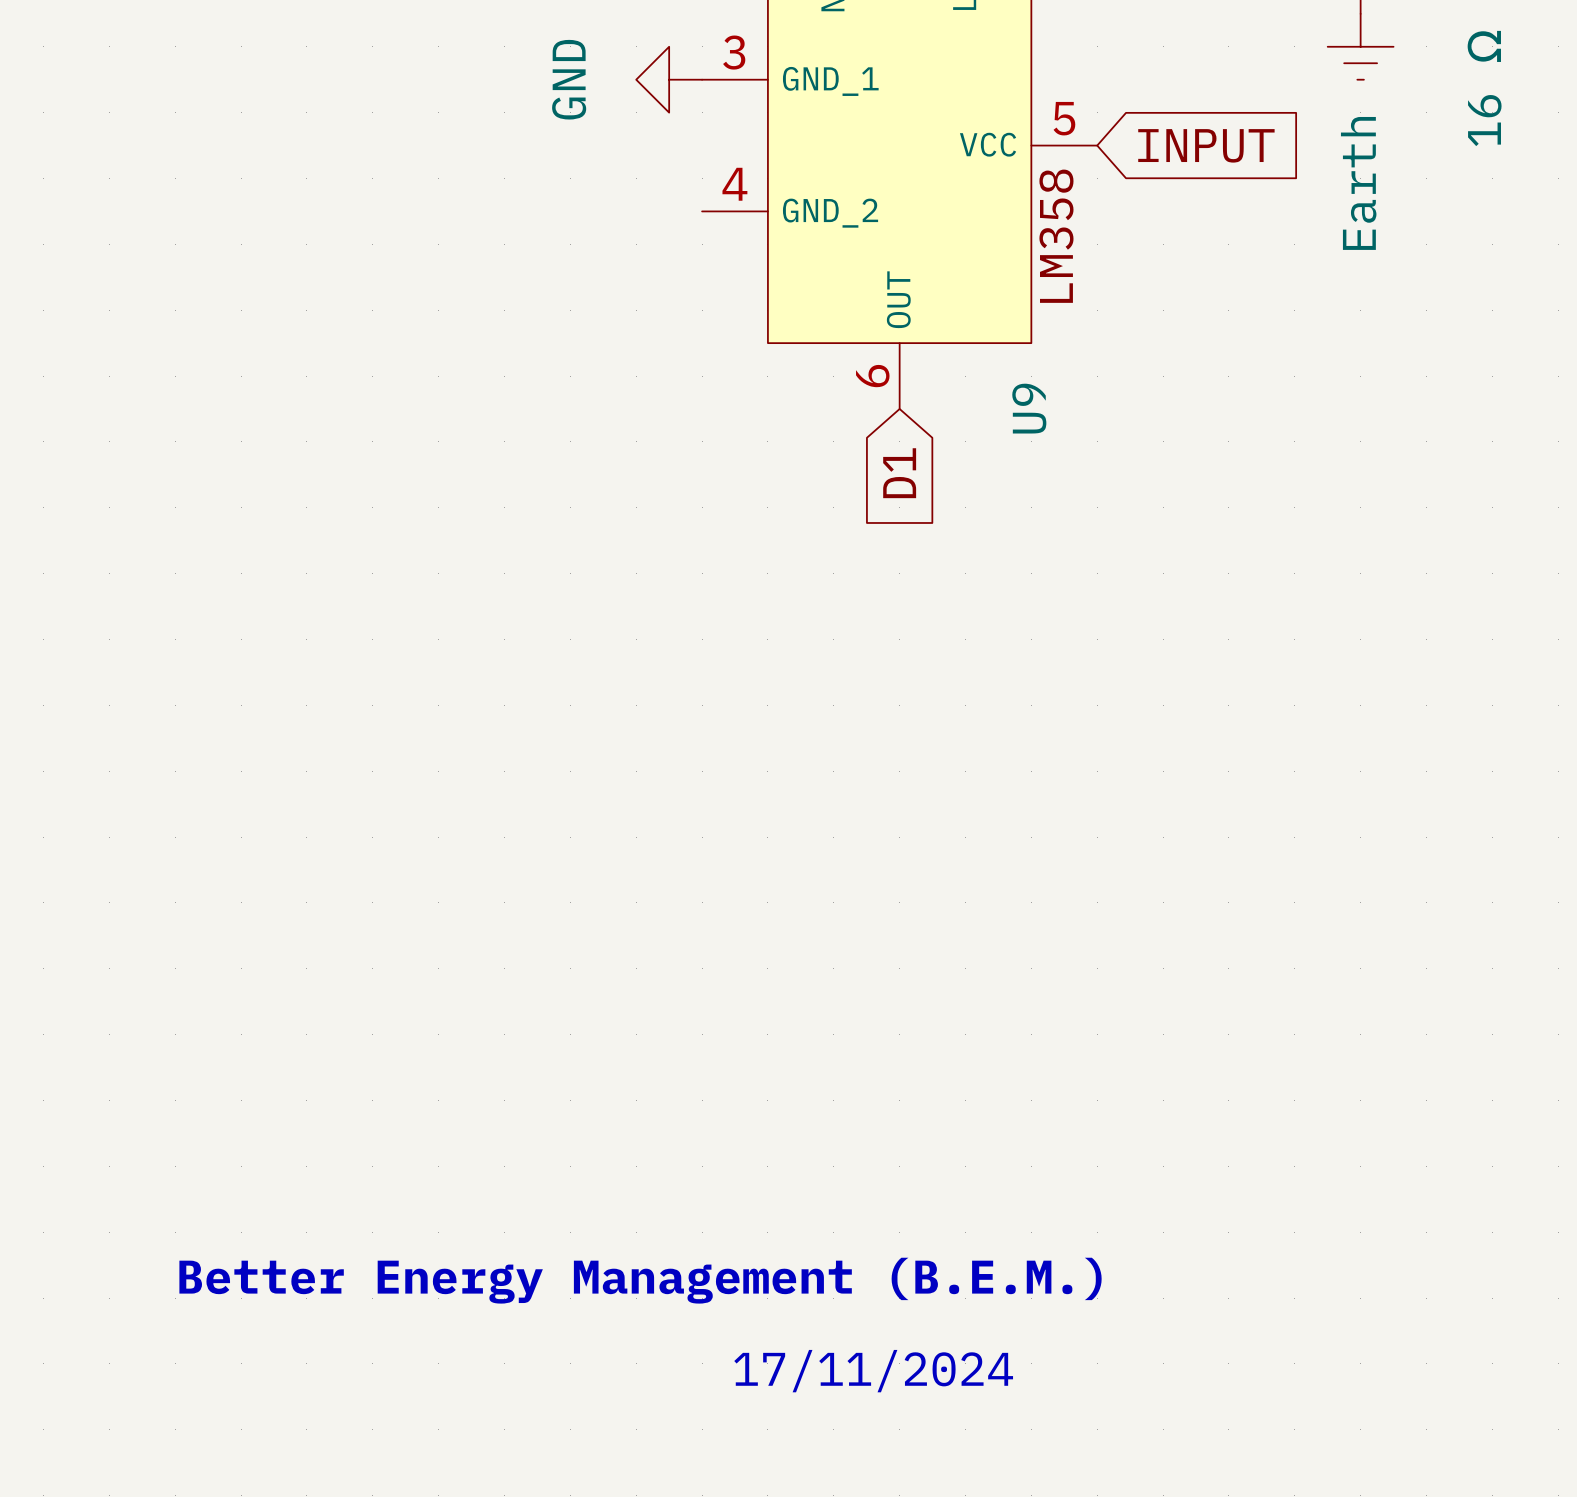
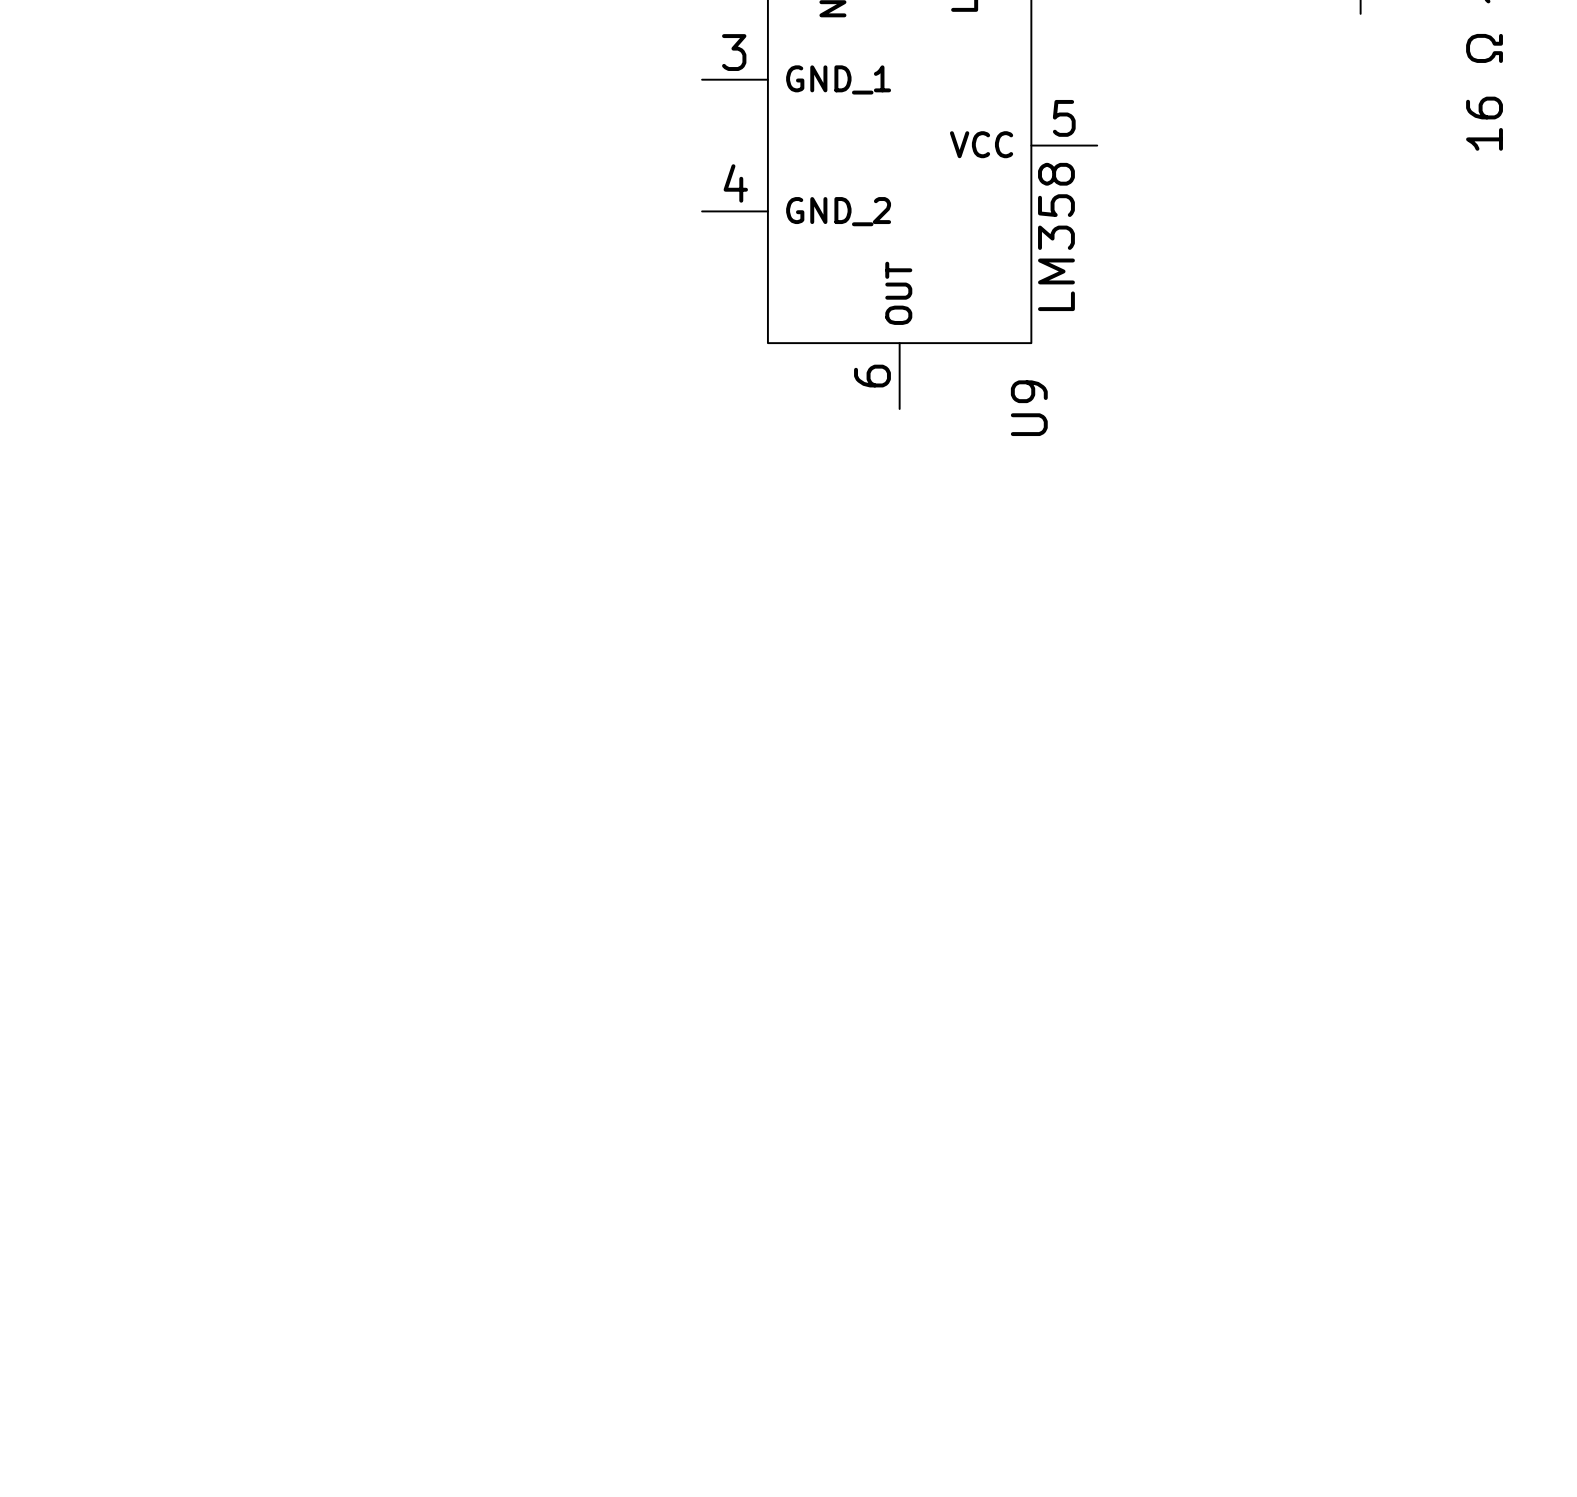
power symbol: Earth (1360, 46) -> none
power symbol: GND (669, 79) -> none
global label: INPUT (1206, 145) -> none
global label: D1 (899, 473) -> none
text: Better Energy Management (B.E.M.) (640, 1280) -> none
text: 17/11/2024 (873, 1371) -> none

